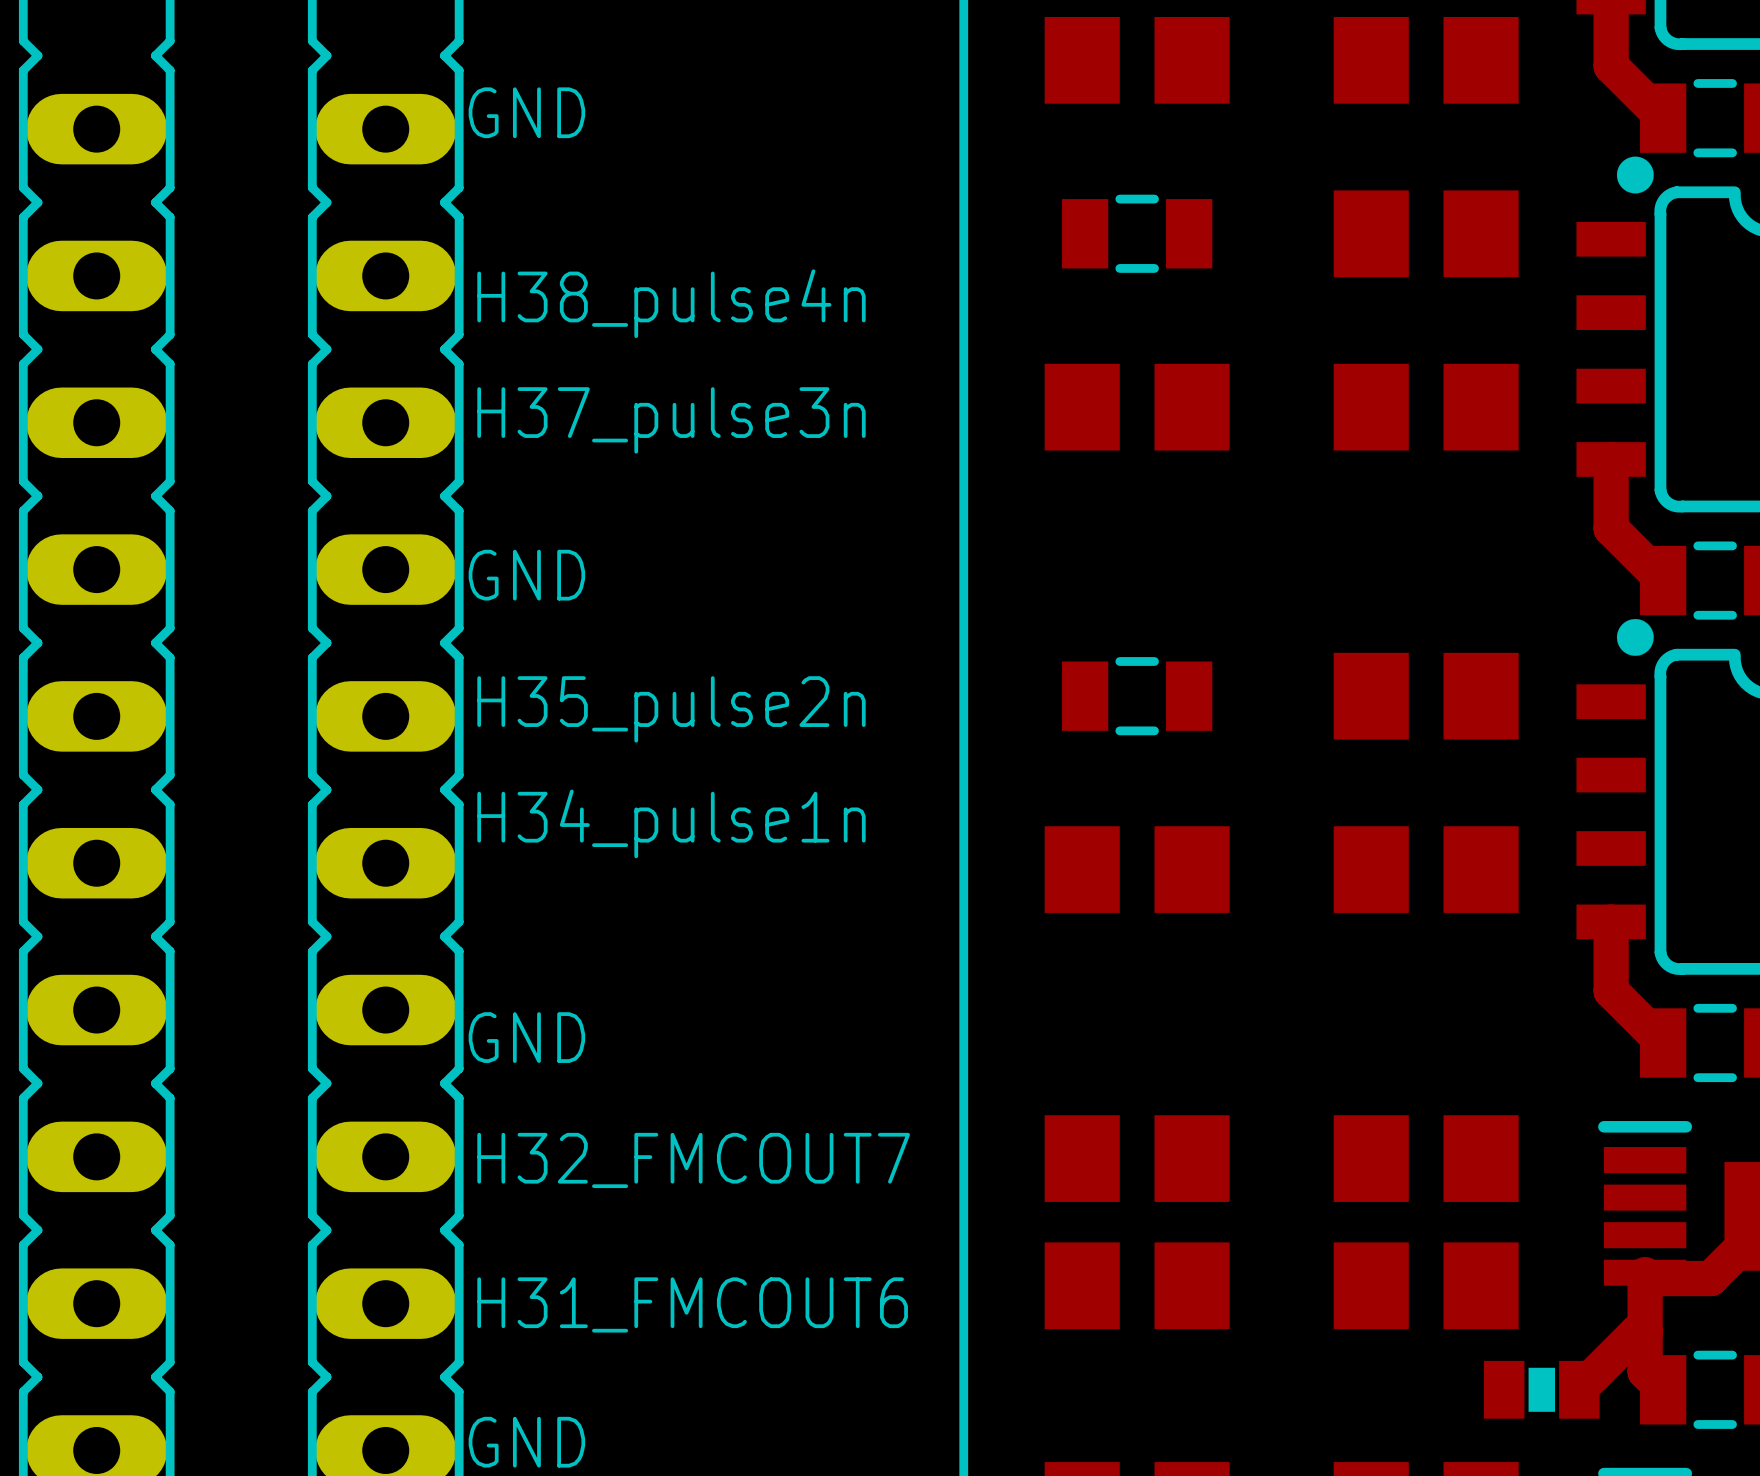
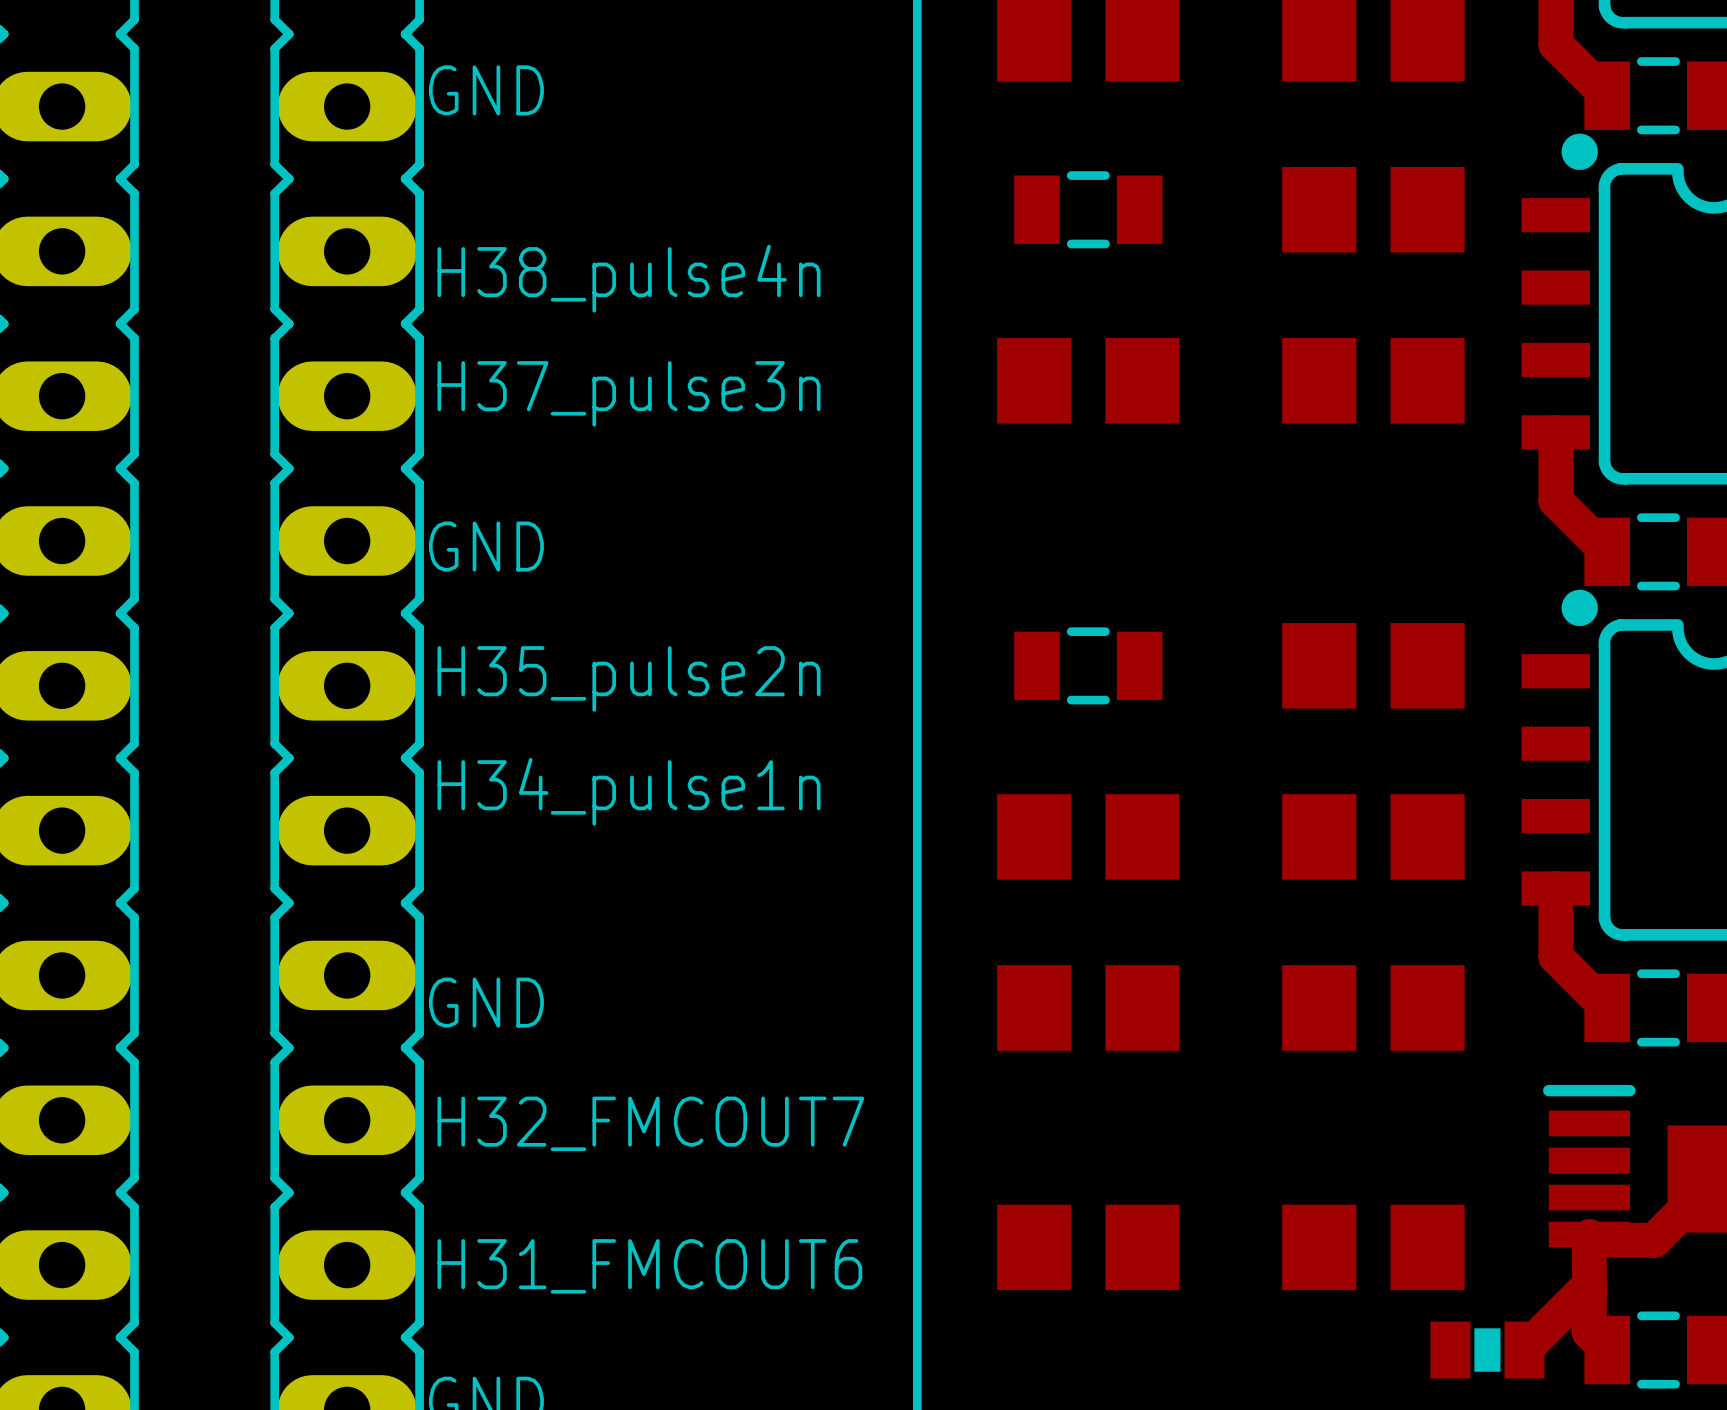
part position: (1137, 1158) -> (1088, 1007)
part position: (1426, 1158) -> (1373, 1007)

